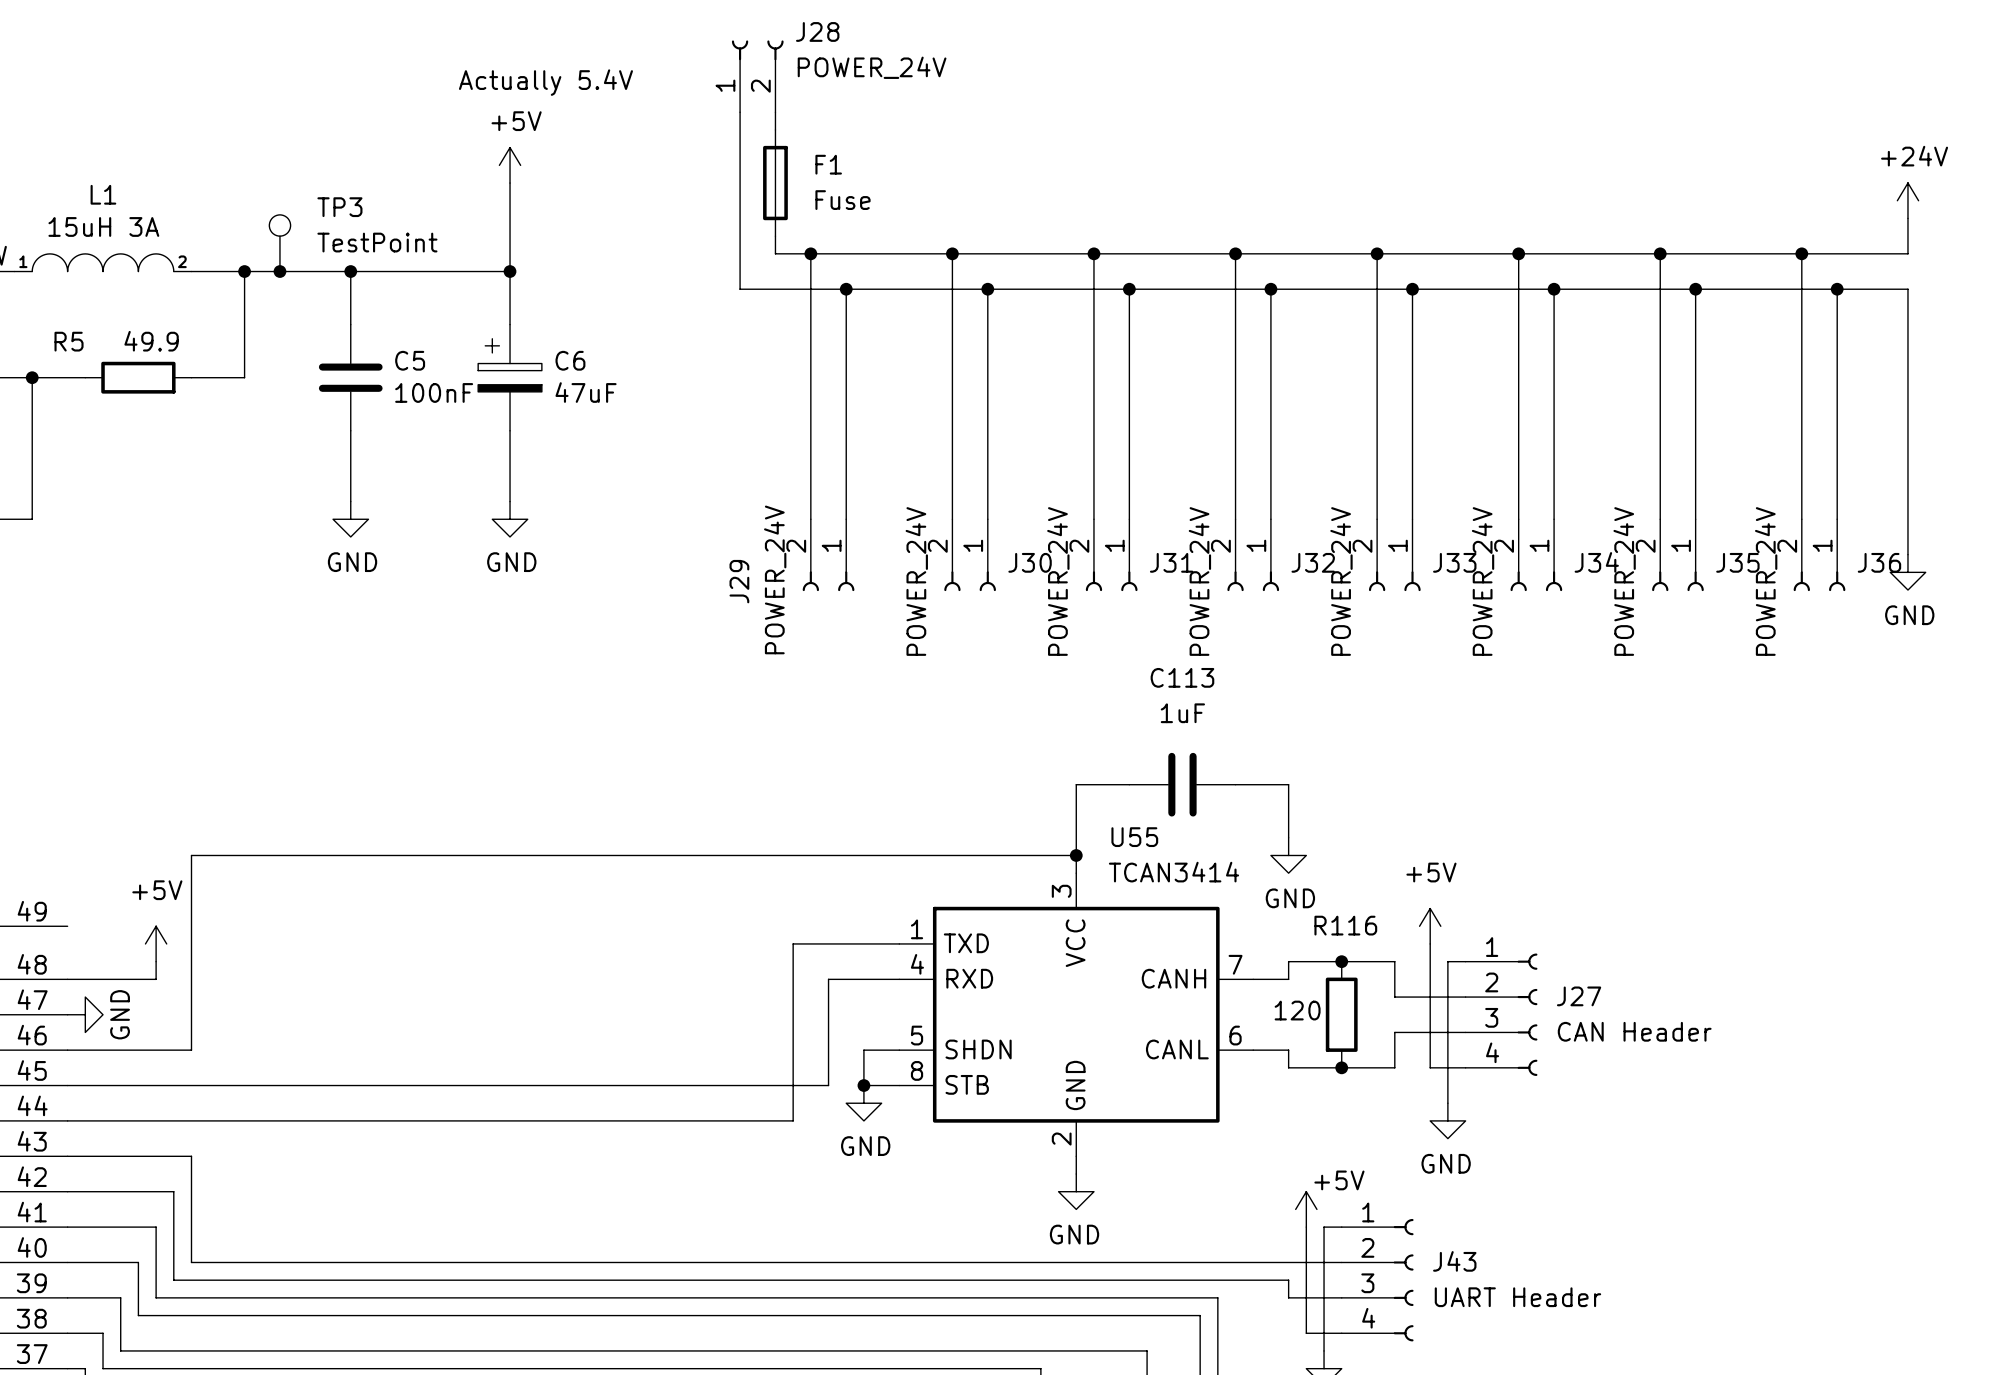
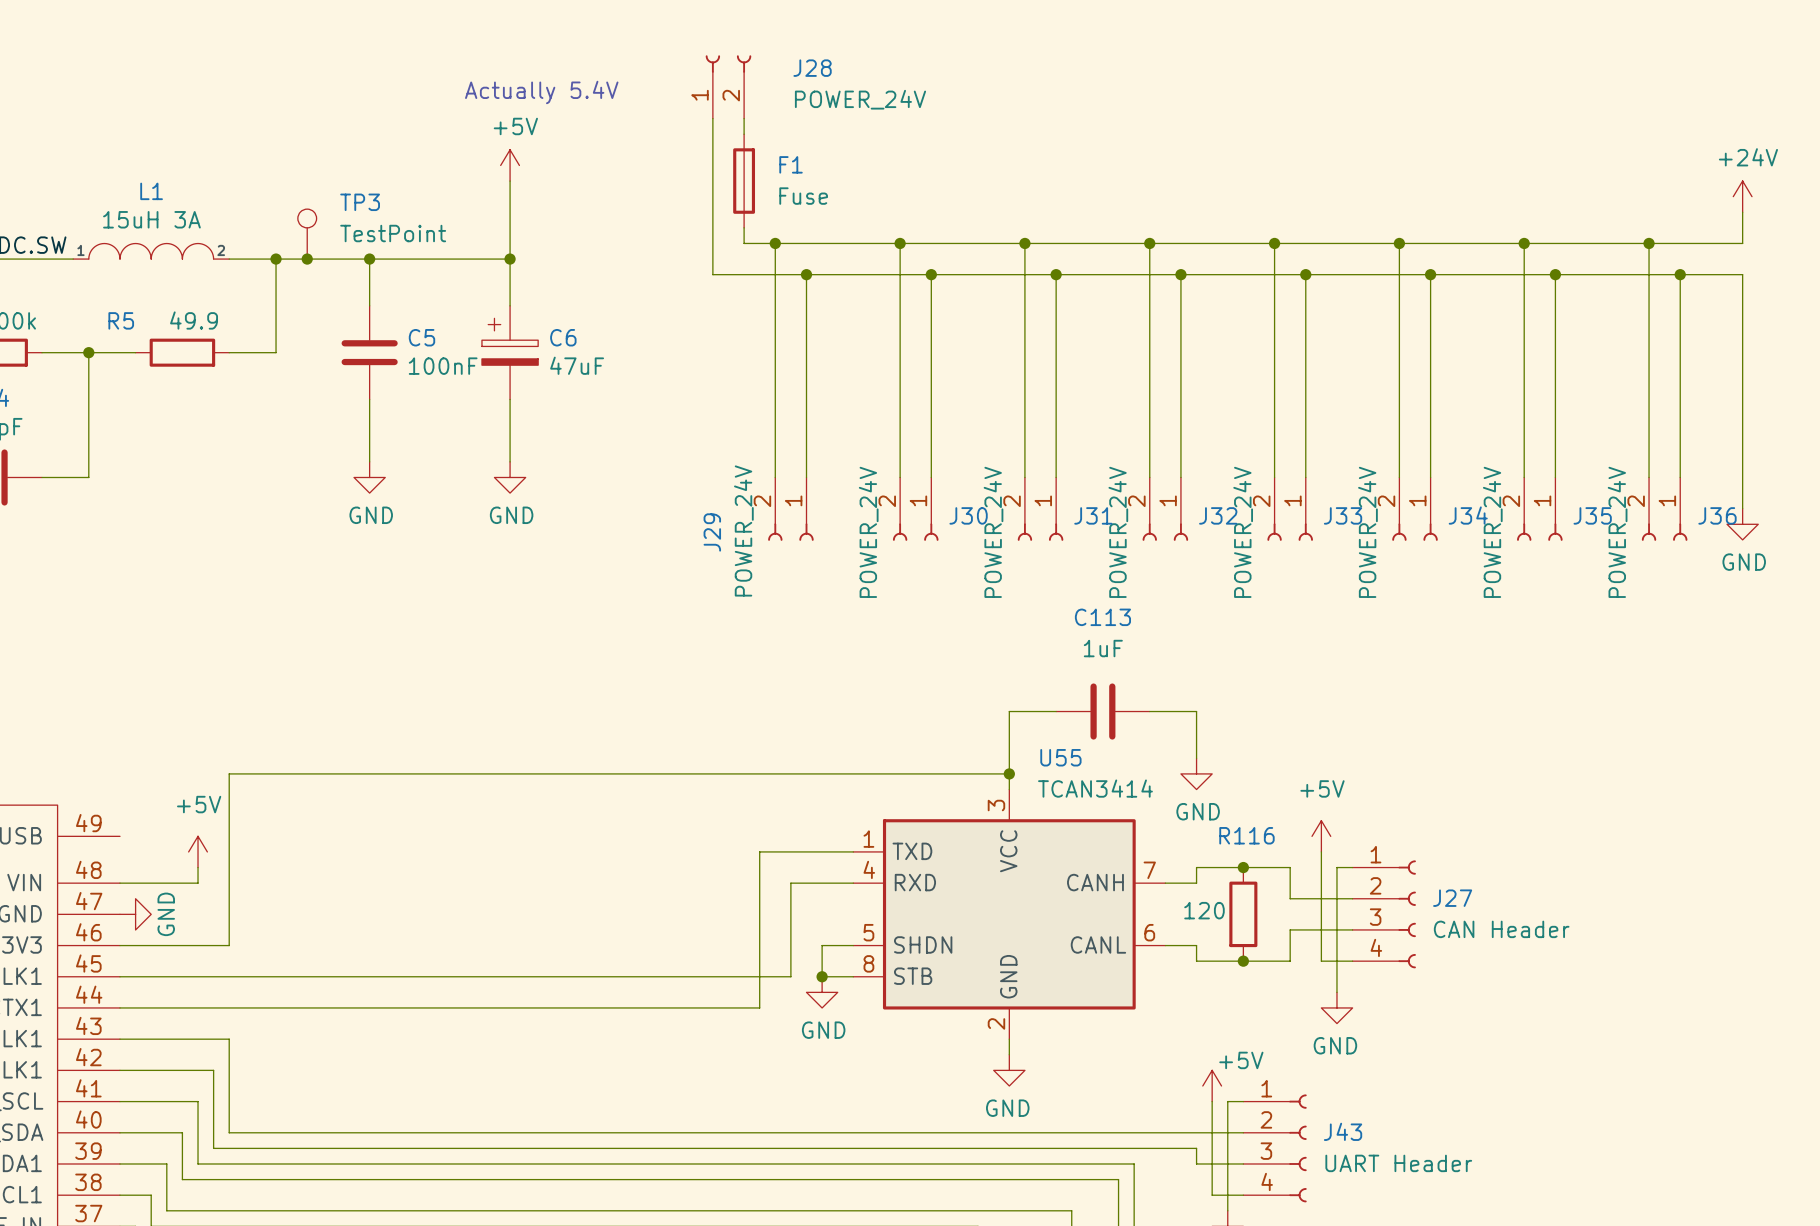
J28 name position: J28 (817, 31) -> J28 (812, 68)
J28 value position: POWER_24V (872, 67) -> POWER_24V (860, 99)

